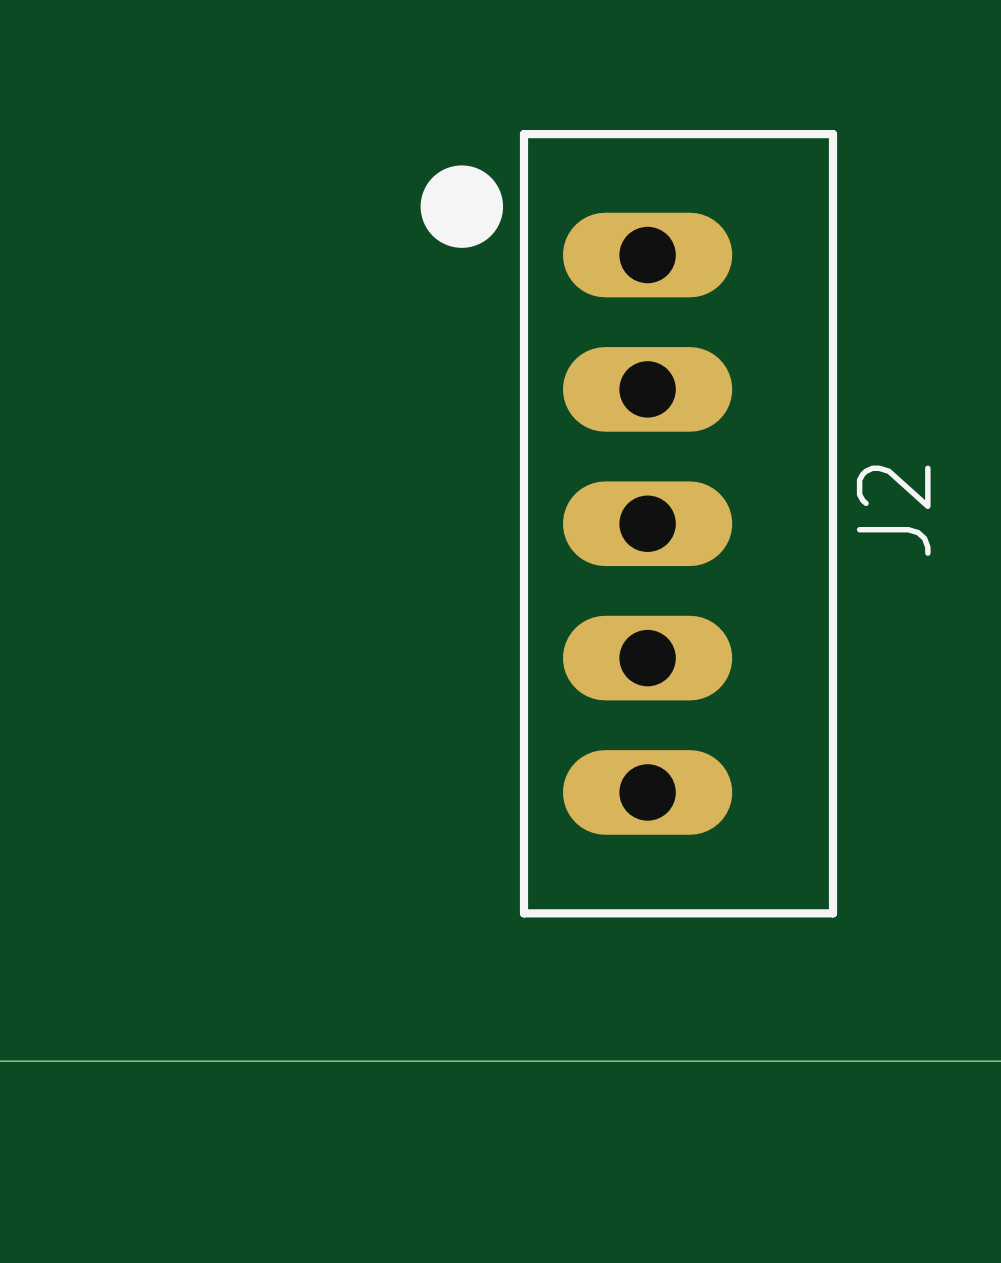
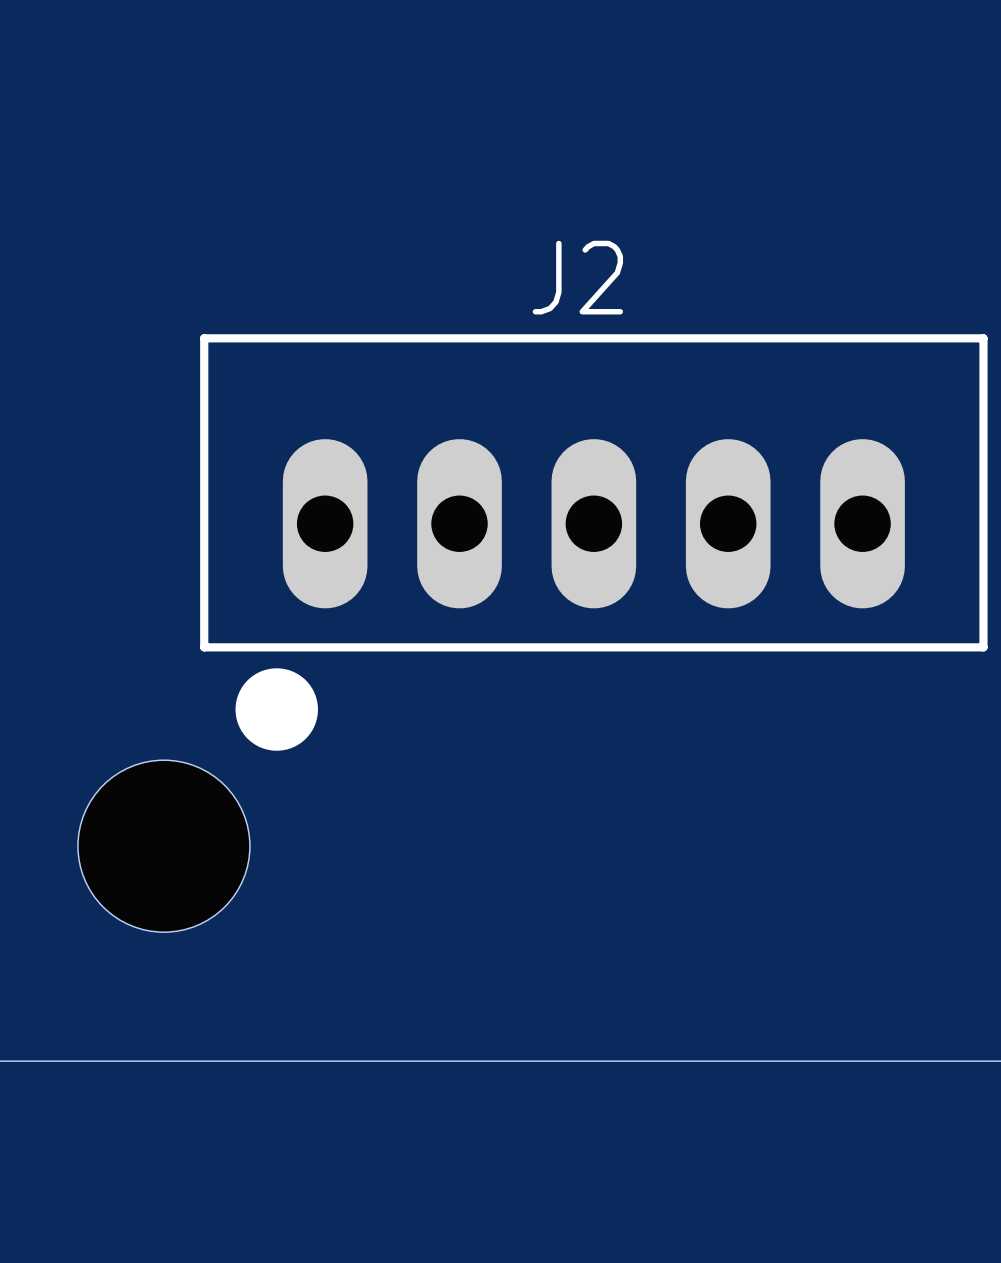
J2 rotation: 0° (628, 523) -> 90° counterclockwise (593, 542)
hole: none -> (163, 846)

